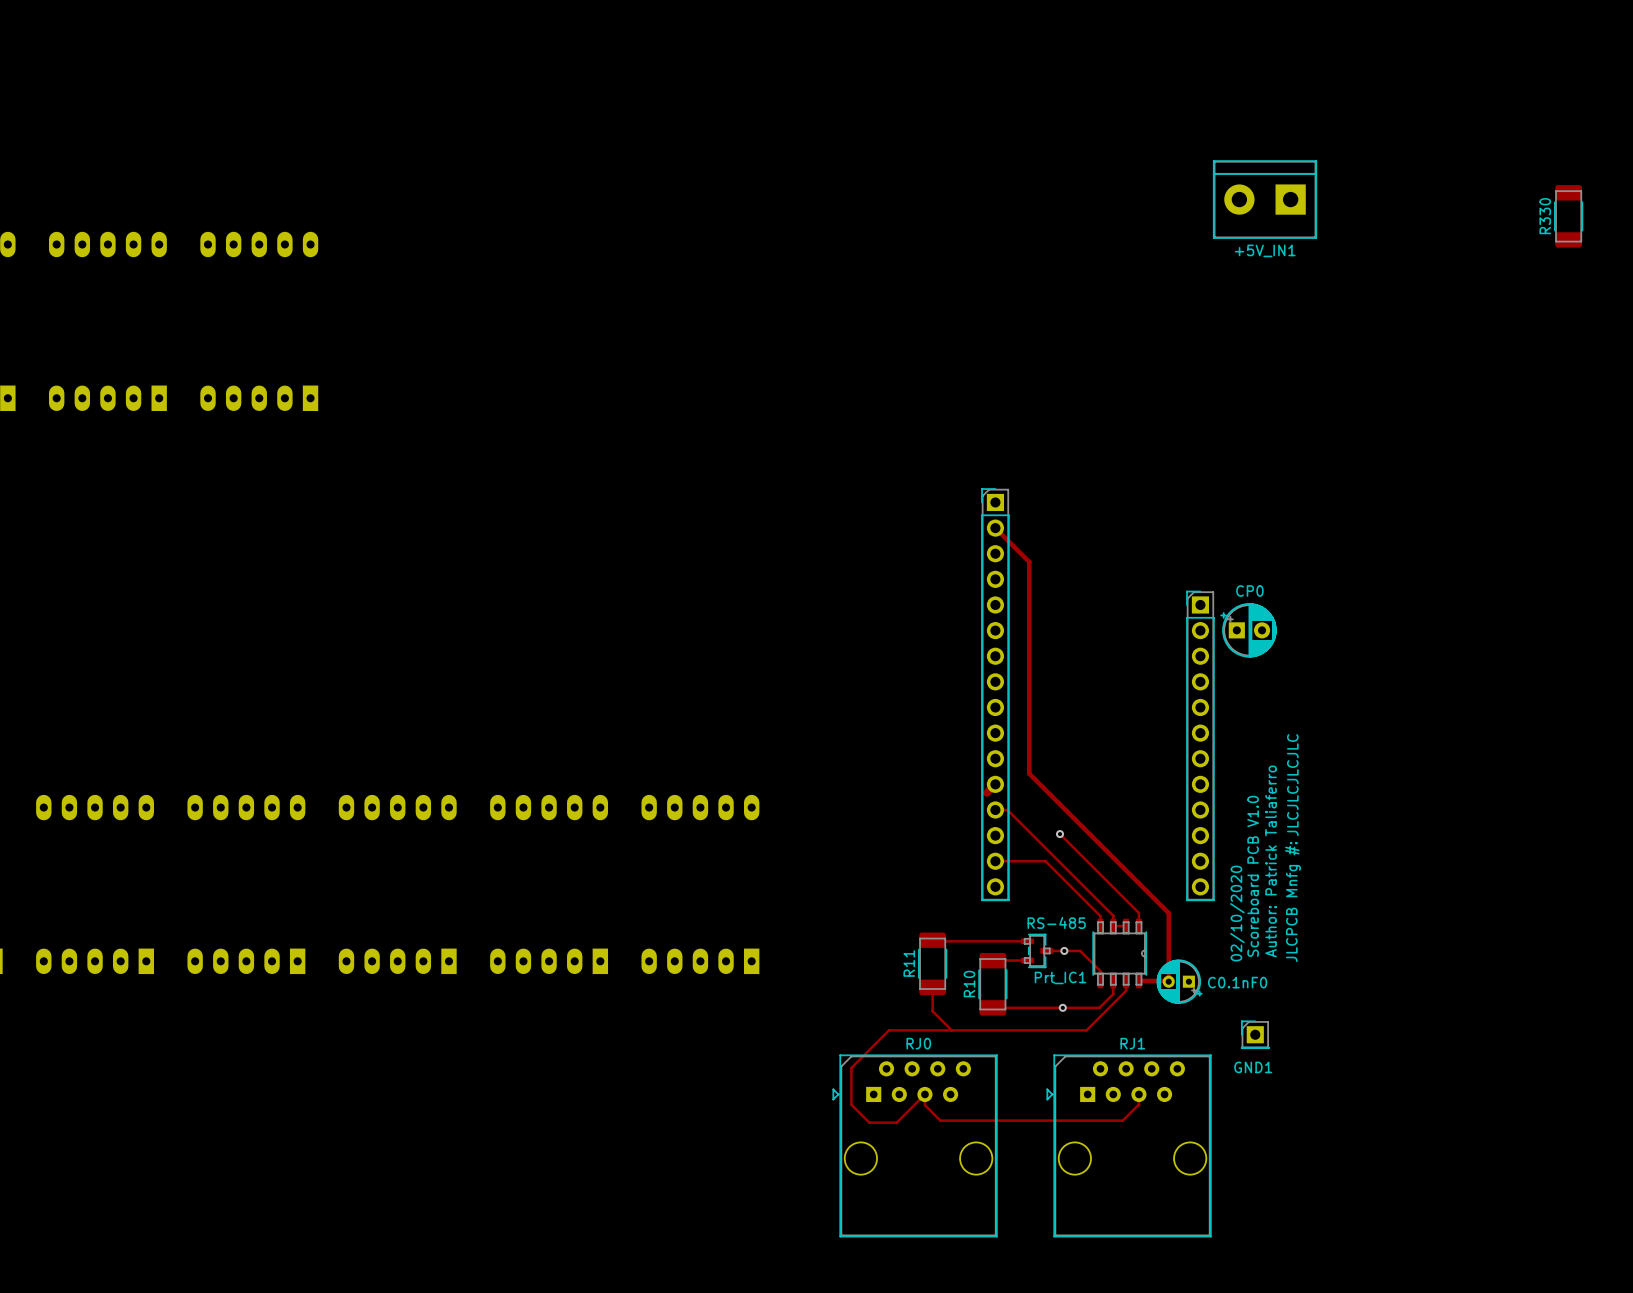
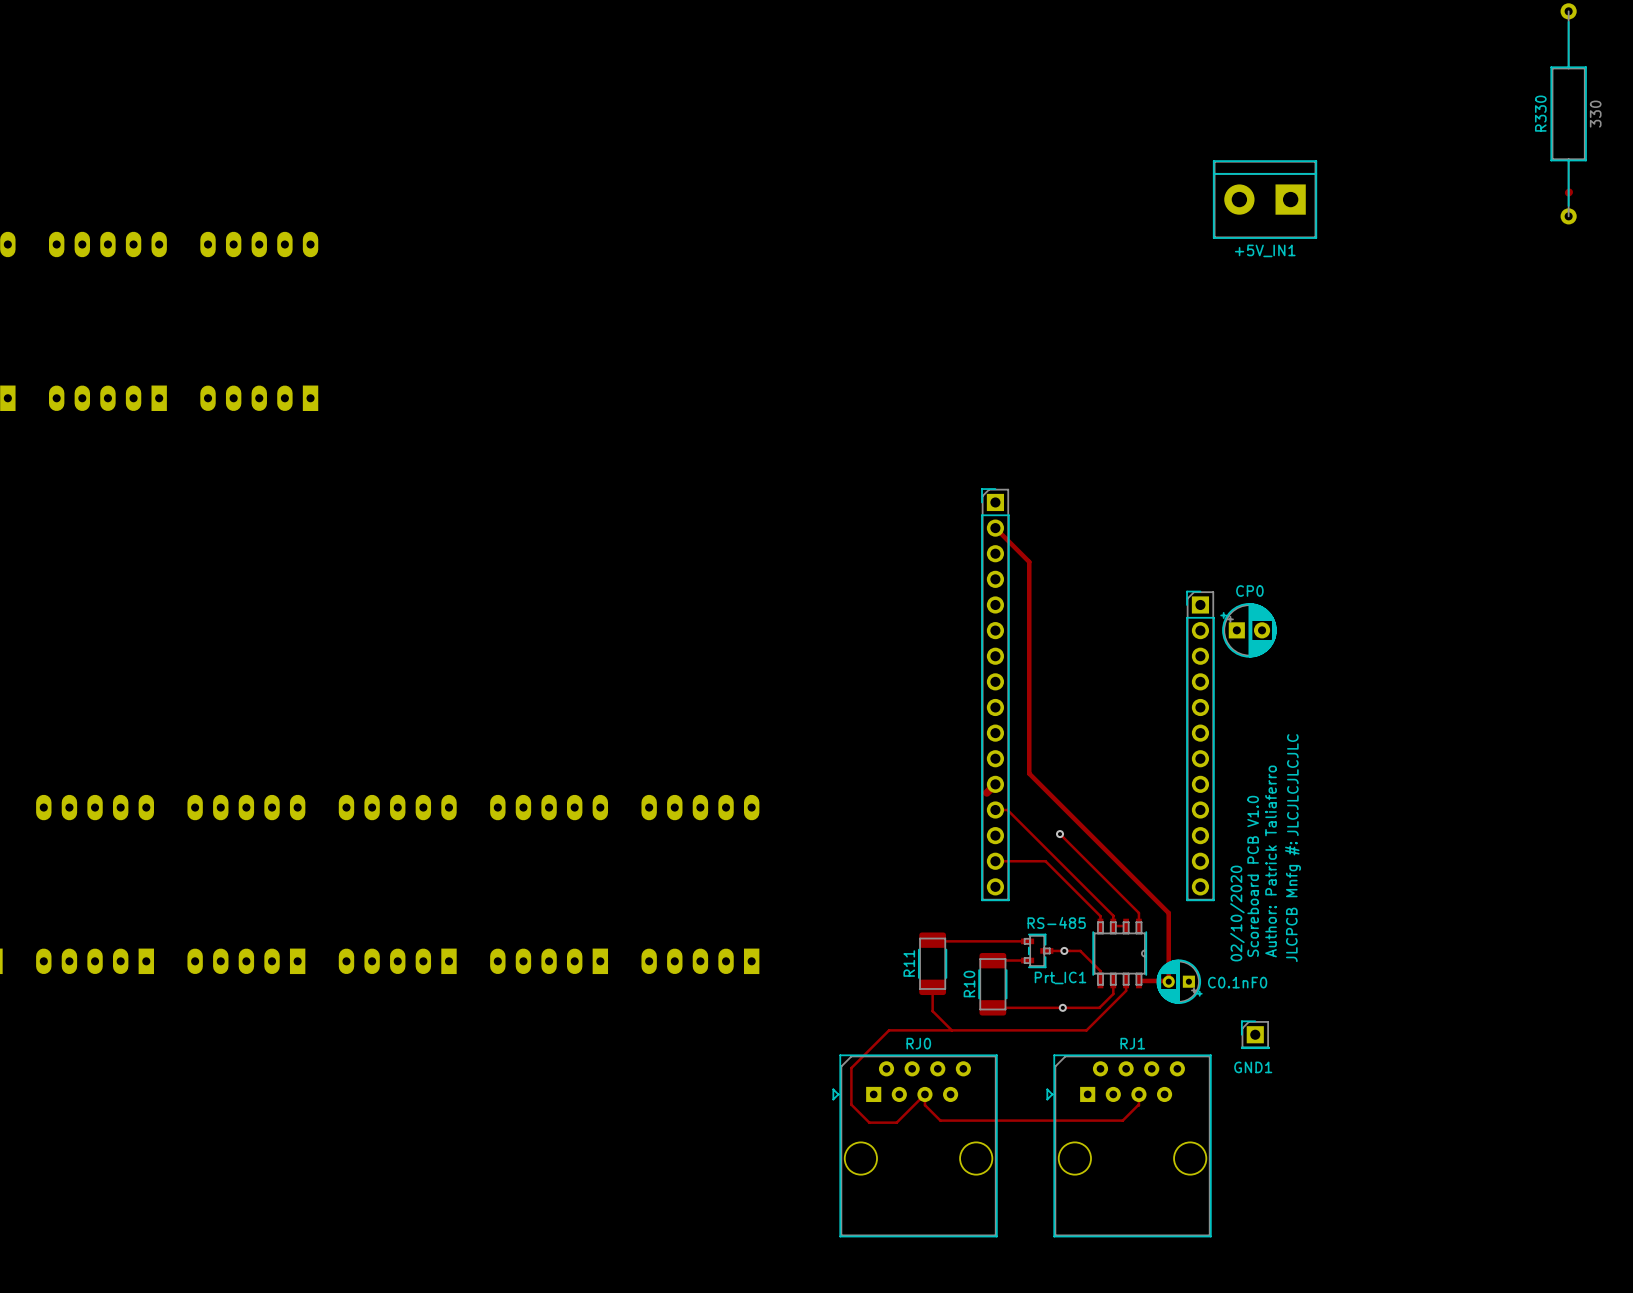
R330 value: none -> 330 (1595, 114)
R330 footprint: [1554, 185, 1583, 248] -> [1550, 3, 1587, 225]

